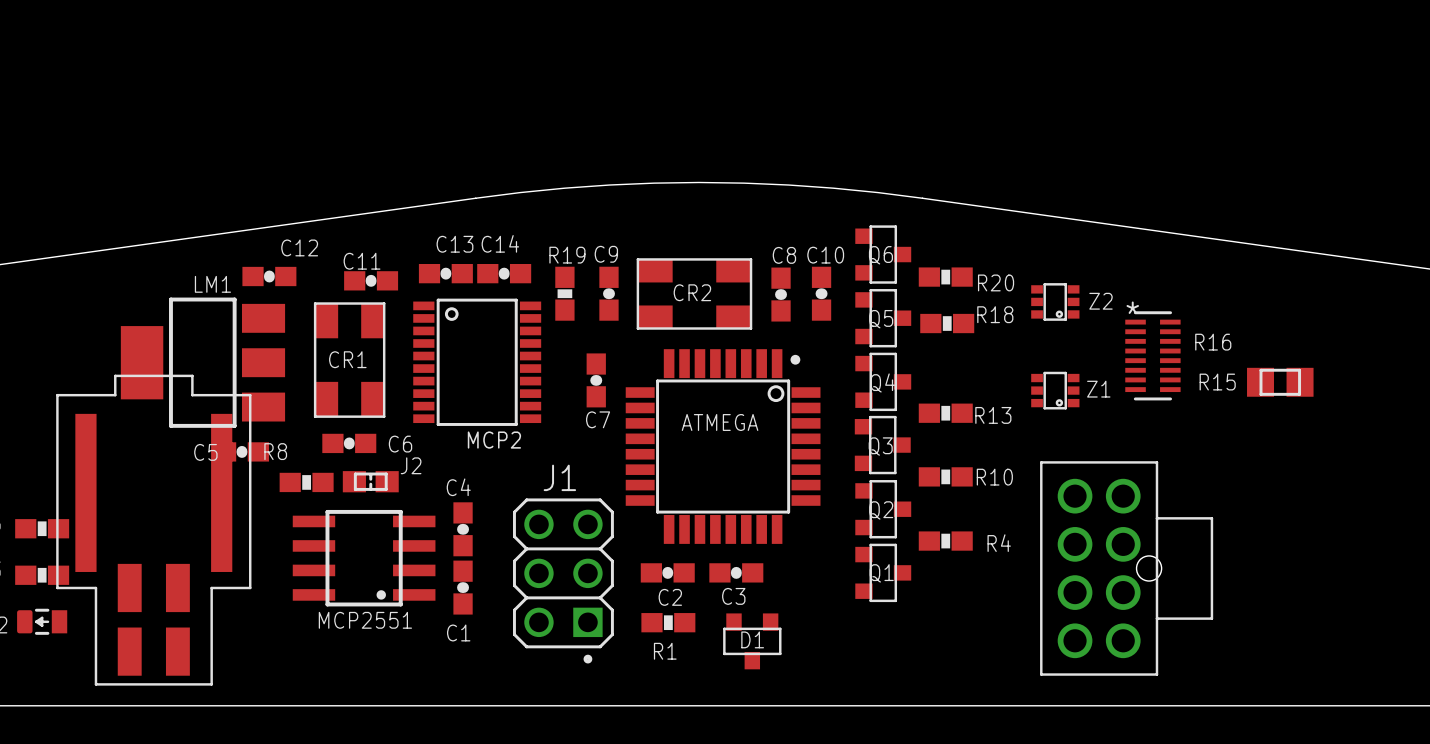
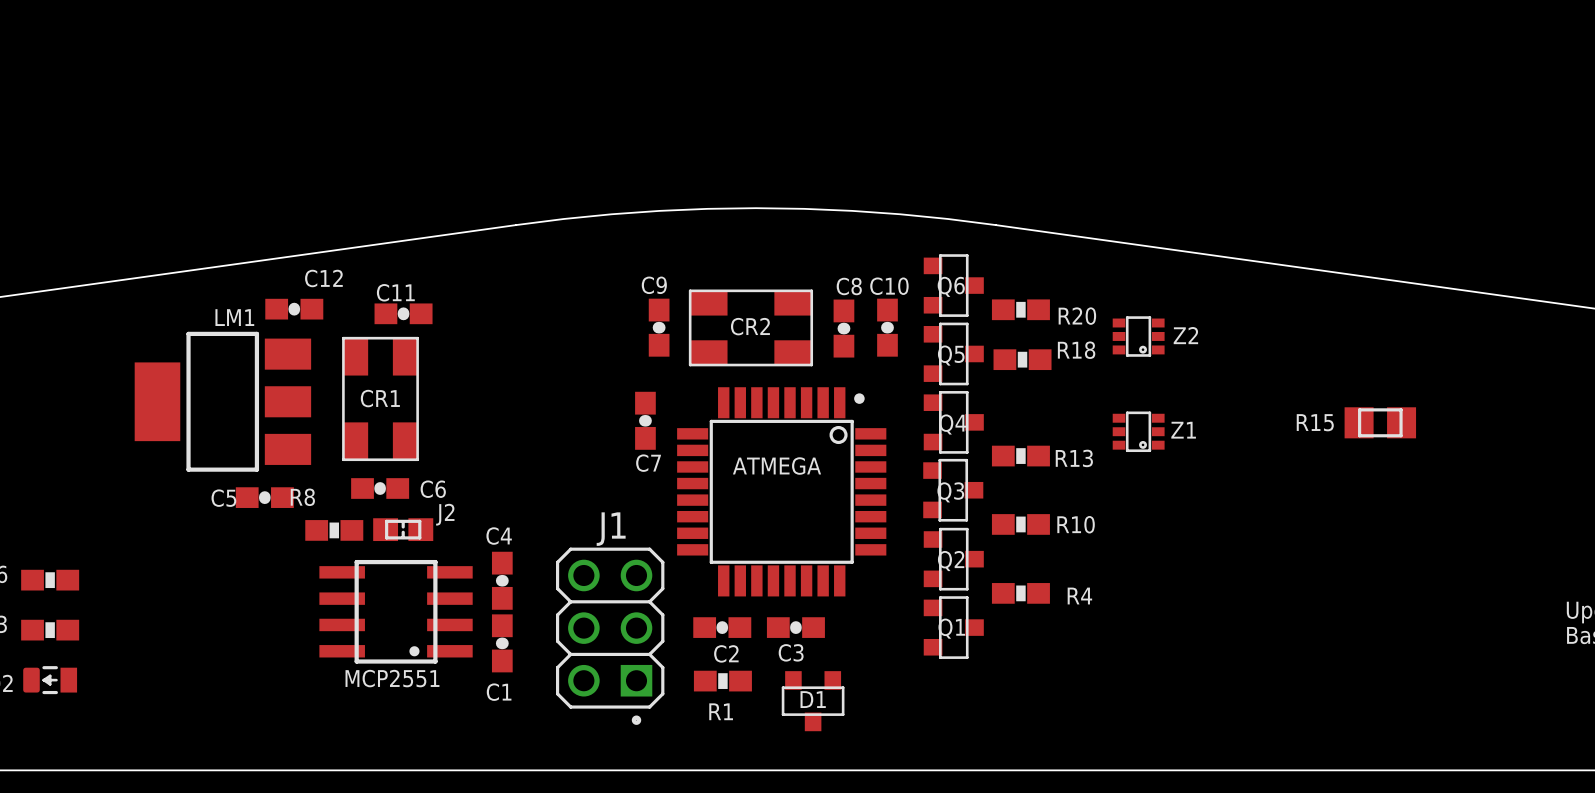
C13: (445, 273) -> none
C14: (504, 273) -> none
R19: (564, 293) -> none
R16: (1152, 355) -> none
MCP2: (477, 362) -> none
part: (153, 530) -> none
part: (1126, 568) -> none

